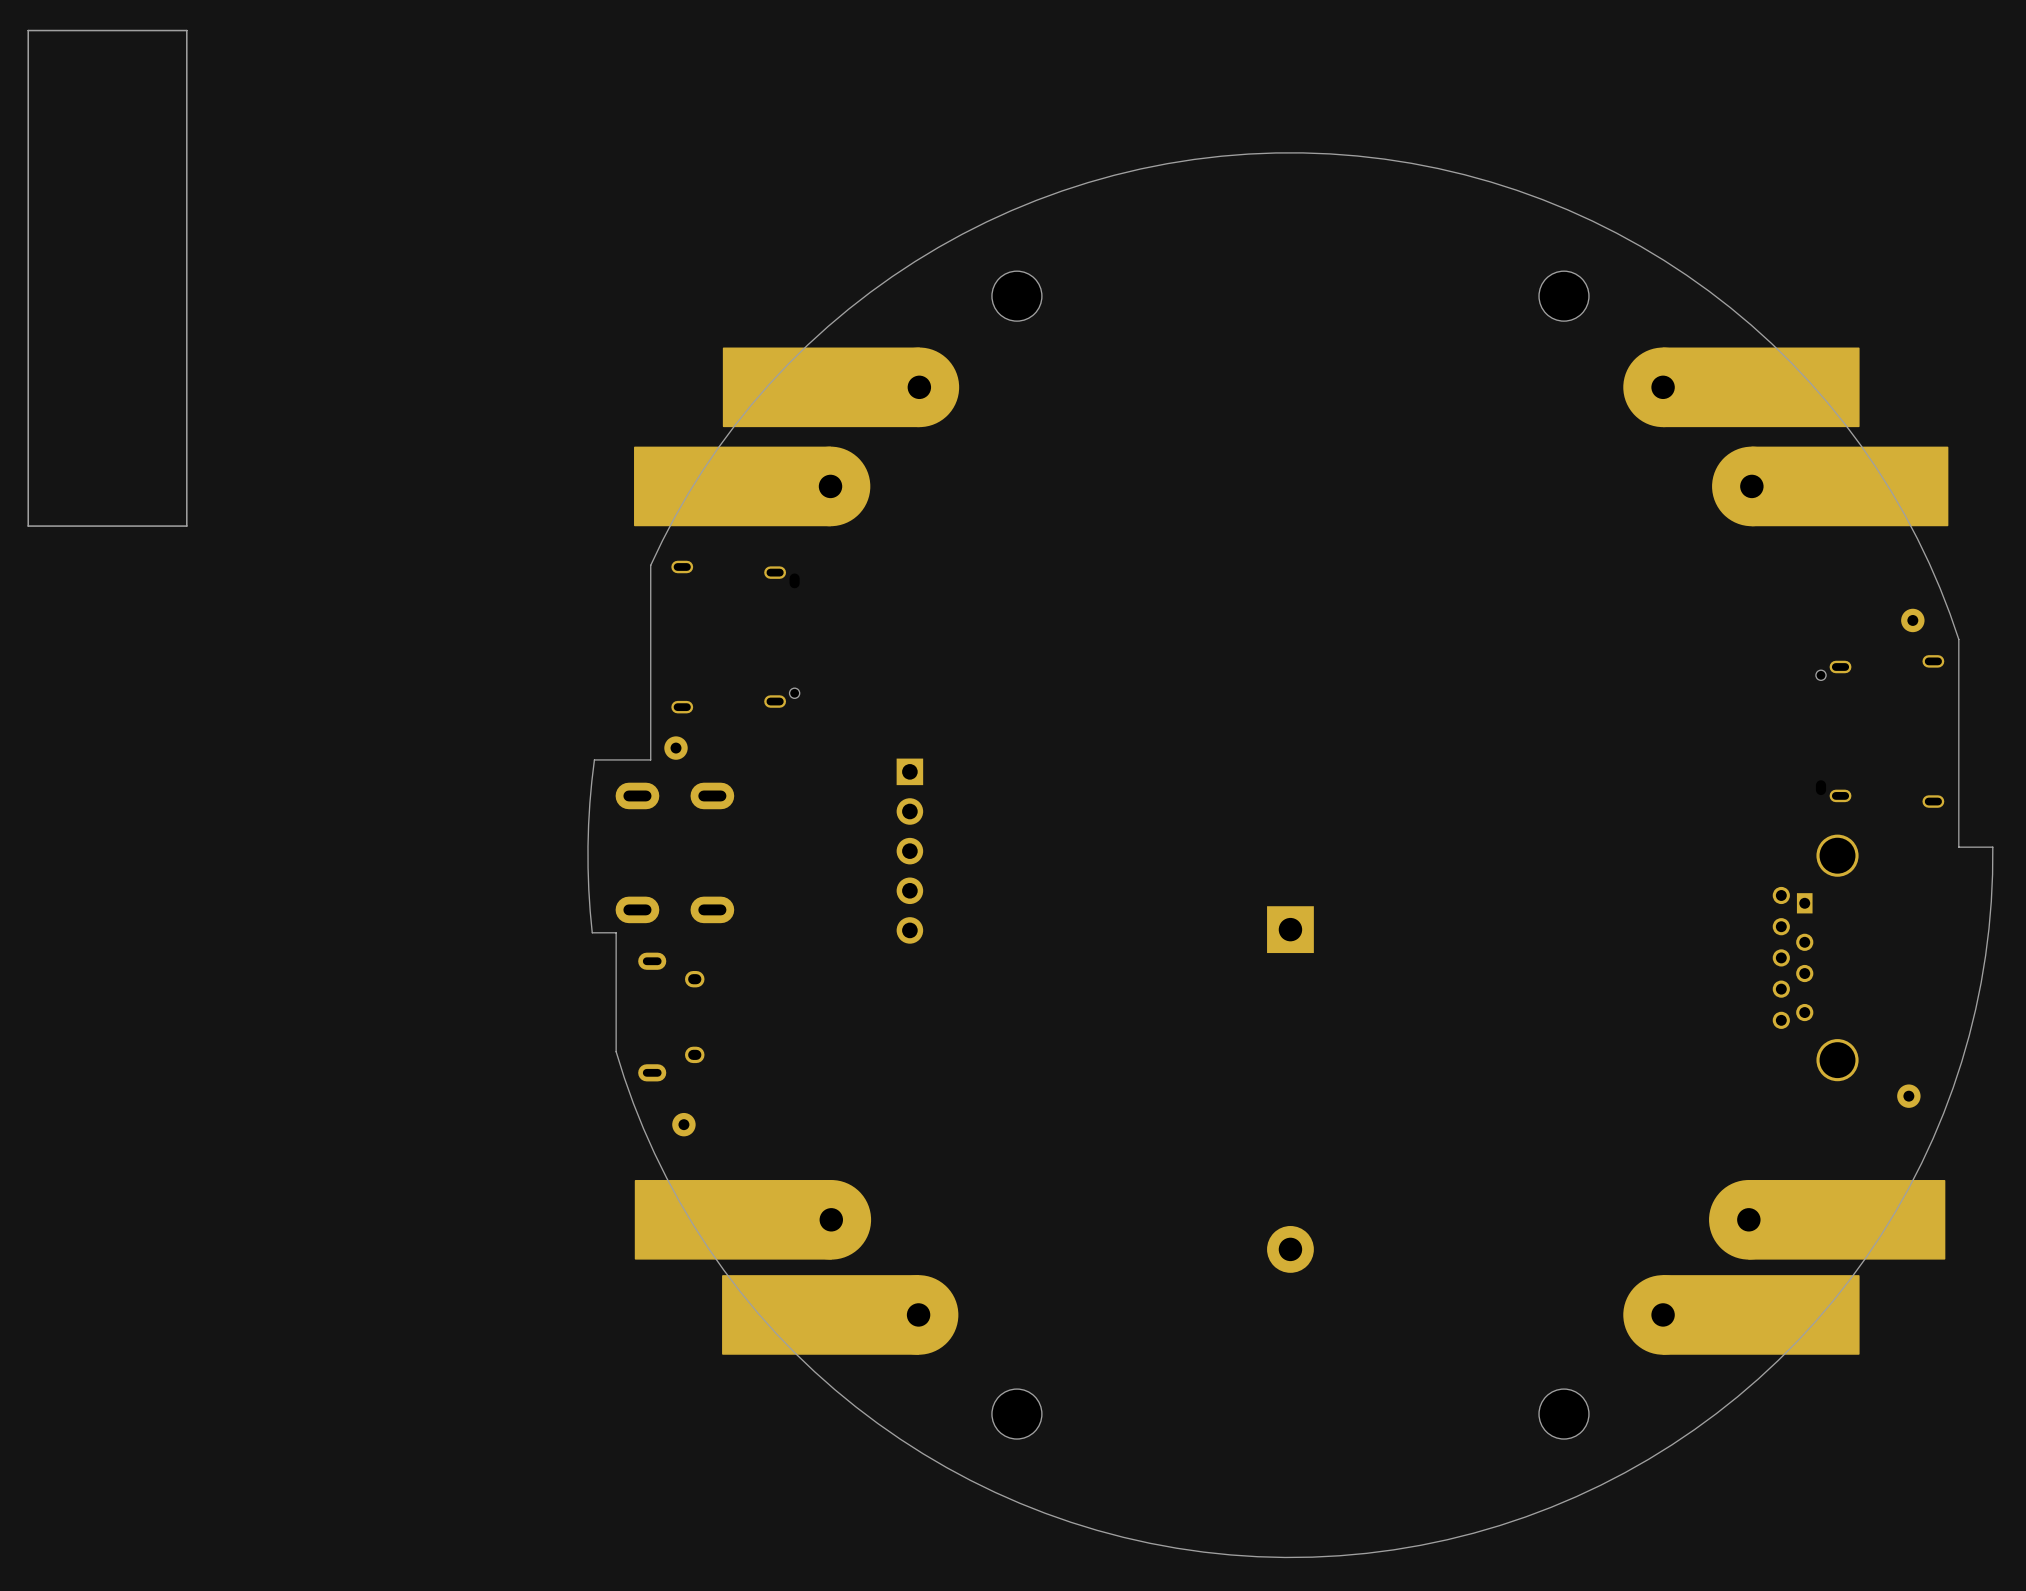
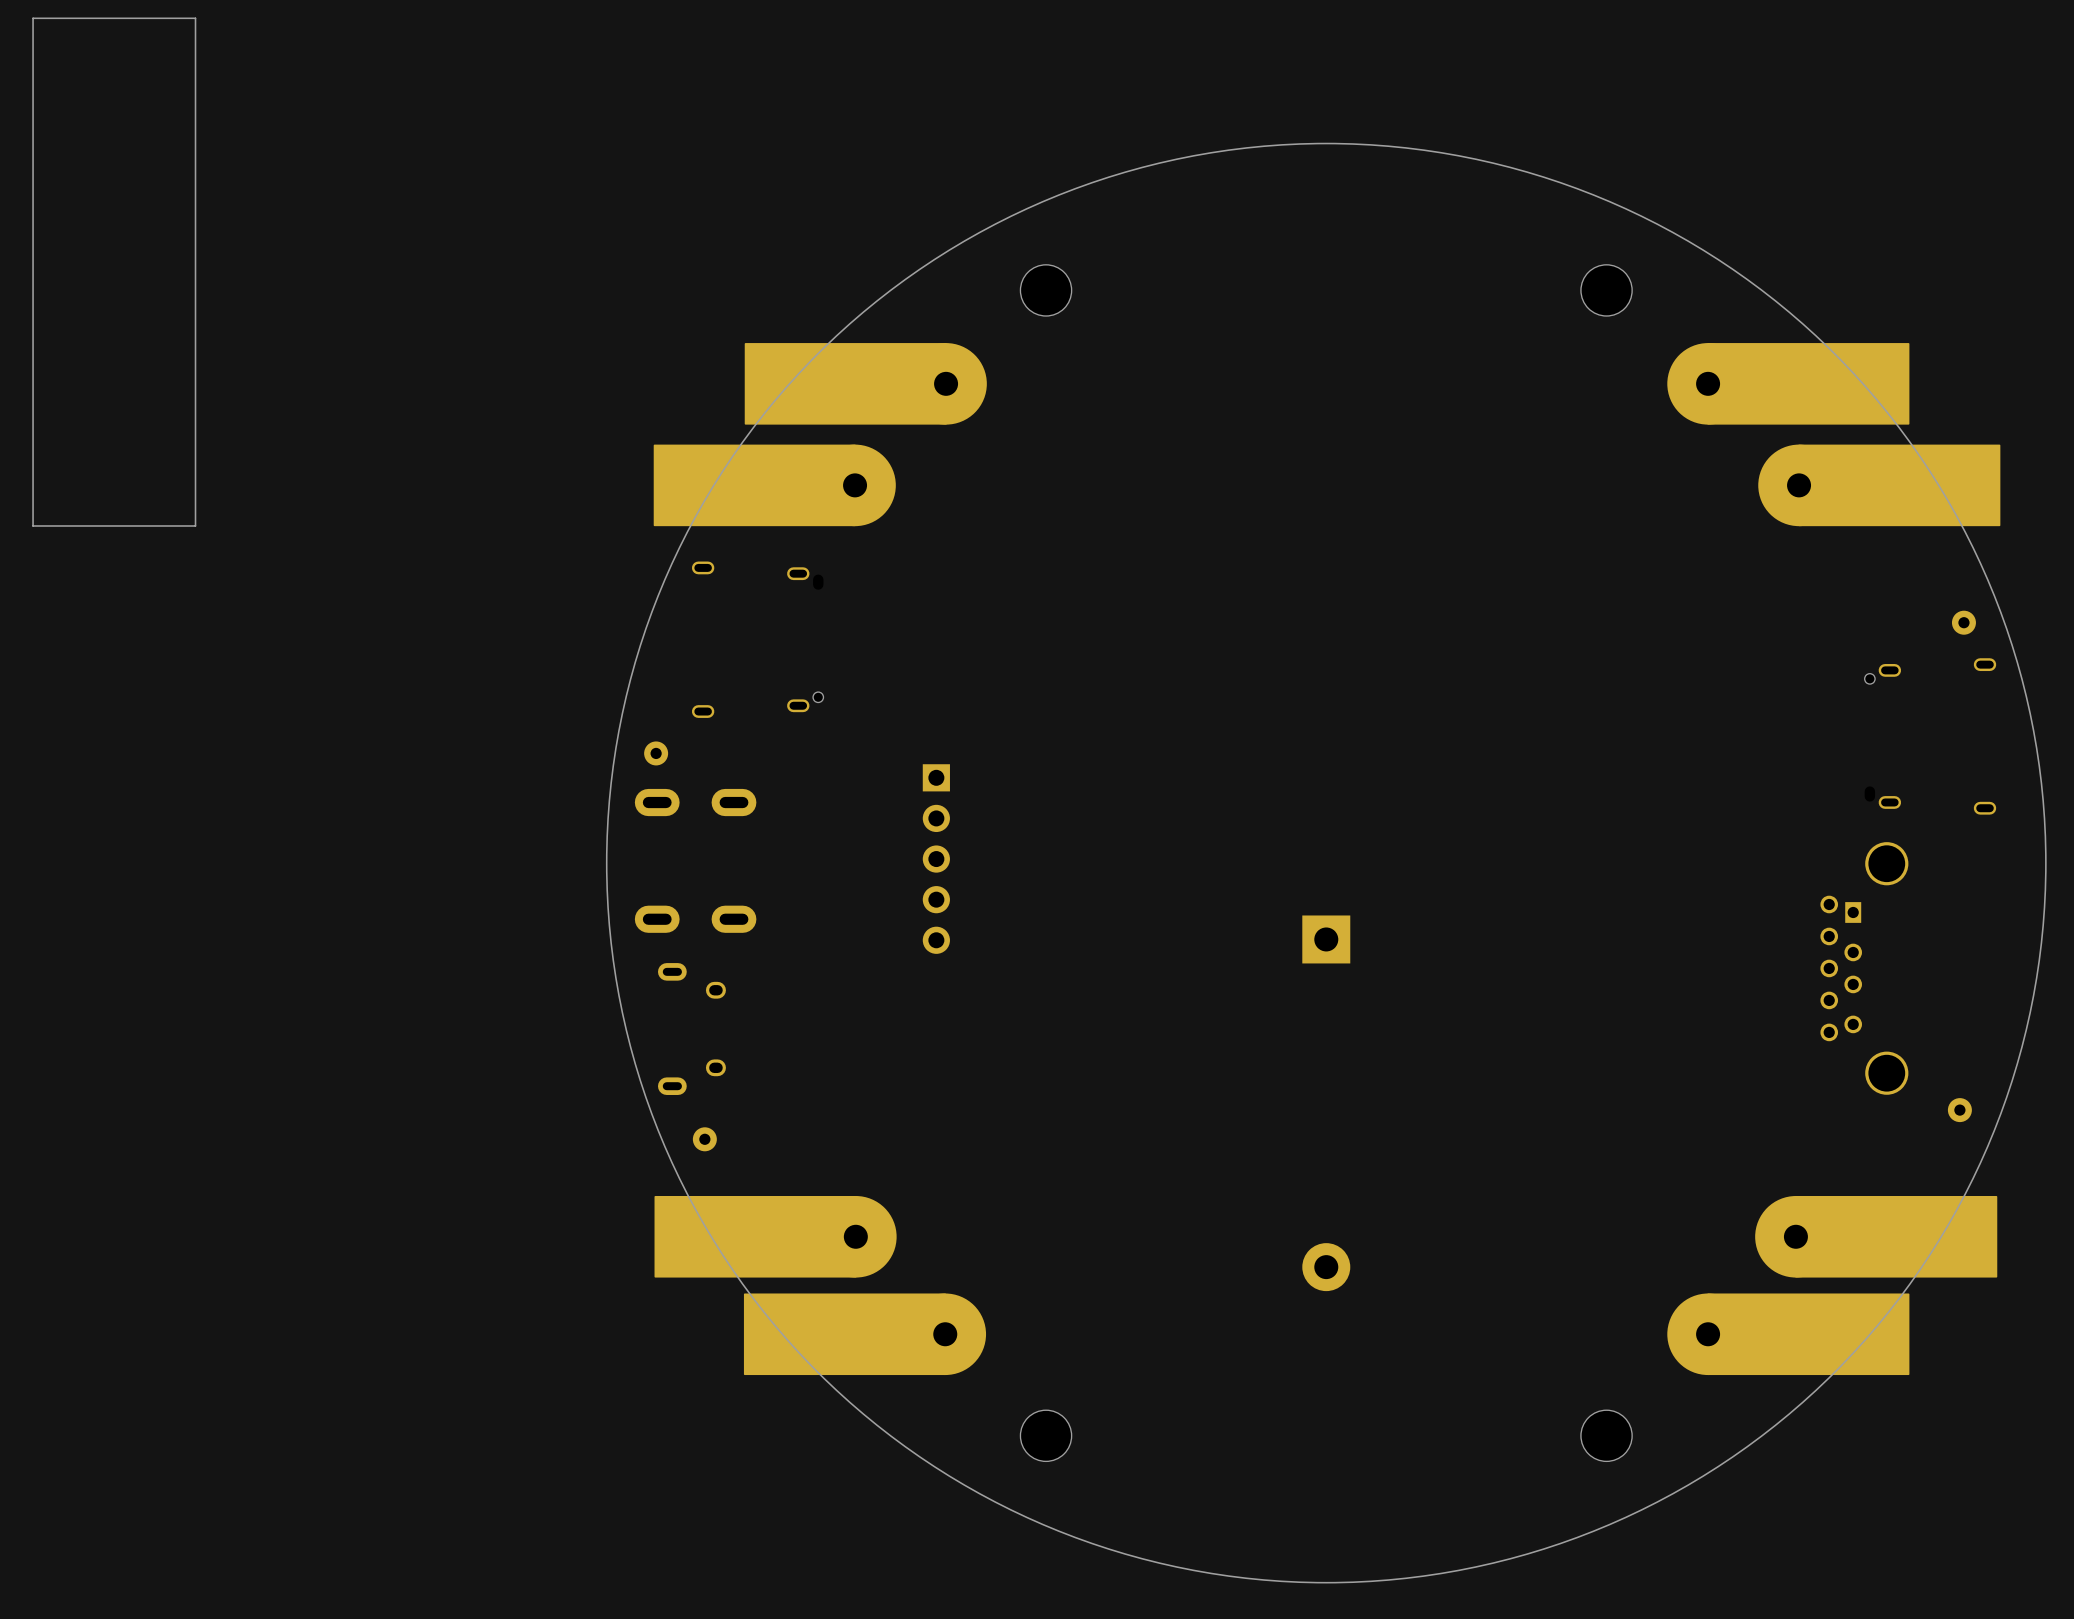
round board edge: none -> [605, 142, 2047, 1584]
part position: (676, 748) -> (656, 753)
board edge: (650, 759) (650, 565) (688, 493) (734, 425) (788, 364) (848, 309) (892, 276) (962, 234) (1011, 210) (1088, 182) (1167, 163) (1248, 154) (1330, 153) (1384, 159) (1464, 174) (1516, 190) (1567, 209) (1640, 246) (1708, 291) (1751, 325) (1790, 362) (1844, 423) (1891, 491) (1917, 538) (1940, 588) (1958, 639) (1958, 847) (1992, 847) (1991, 901) (1985, 955) (1975, 1009) (1961, 1061) (1943, 1113) (1909, 1187) (1881, 1234) (1850, 1278) (1816, 1321) (1758, 1378) (1716, 1413) (1648, 1459) (1600, 1485) (1551, 1507) (1473, 1533) (1420, 1545) (1339, 1555) (1285, 1557) (1230, 1554) (1176, 1548) (1123, 1537) (1045, 1513) (970, 1480) (923, 1453) (856, 1407) (814, 1371) (776, 1333) (724, 1270) (693, 1225) (666, 1177) (633, 1103) (616, 1051) (616, 932) (592, 932) -> none
board edge: (650, 759) (594, 759) (588, 846) (592, 932) -> none

